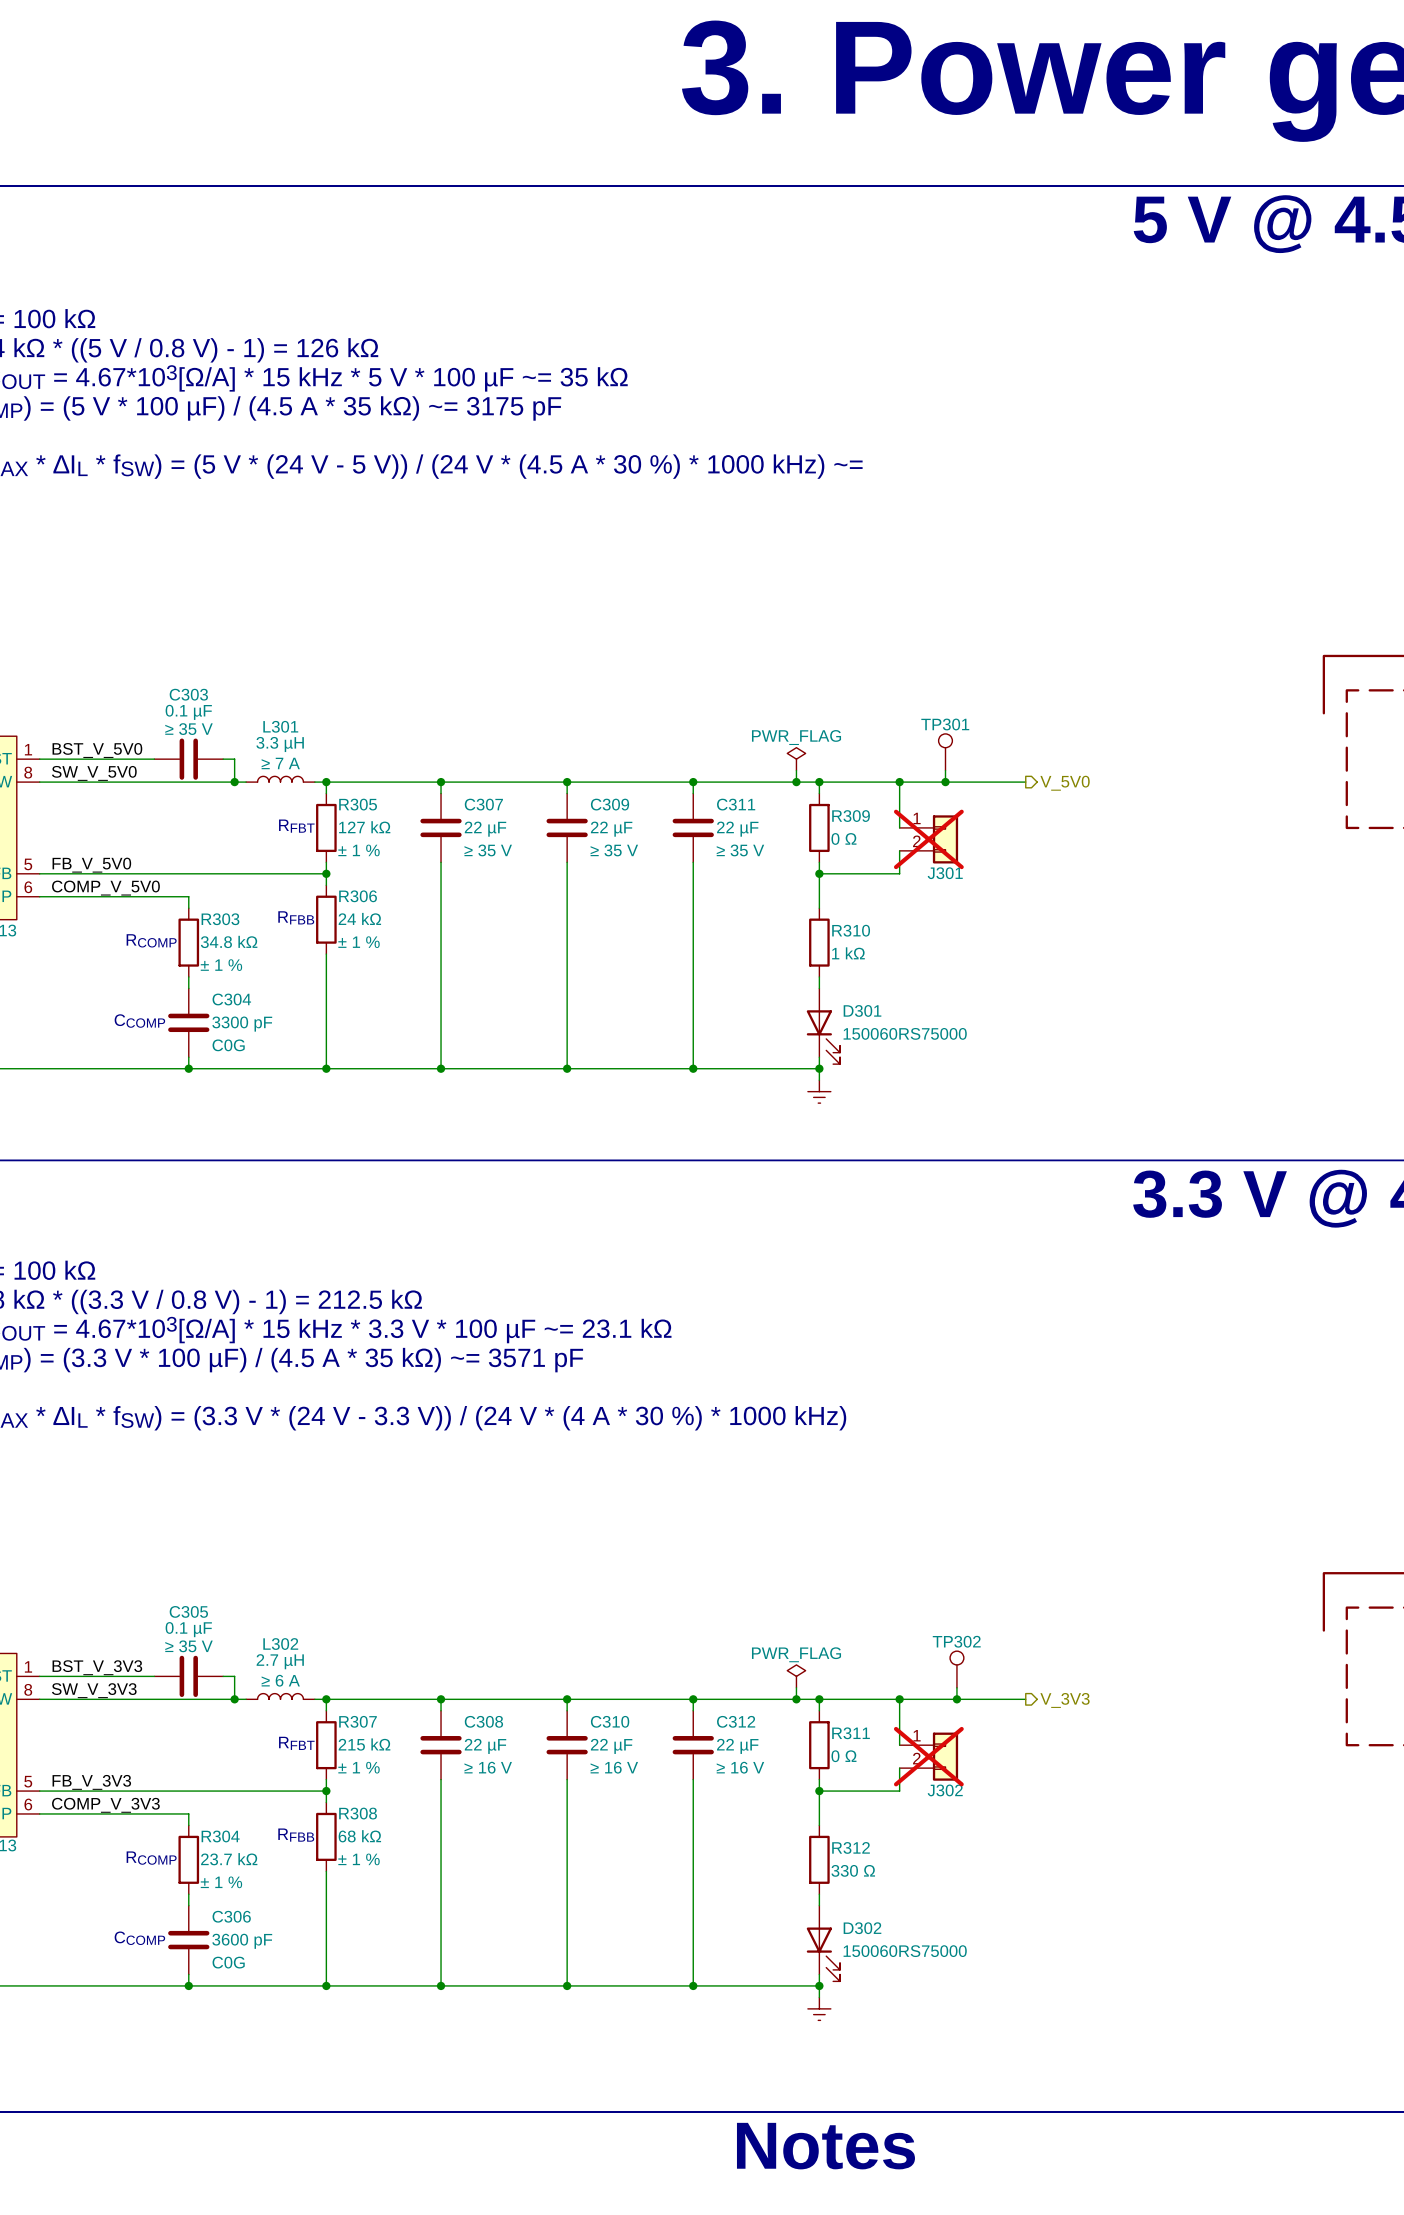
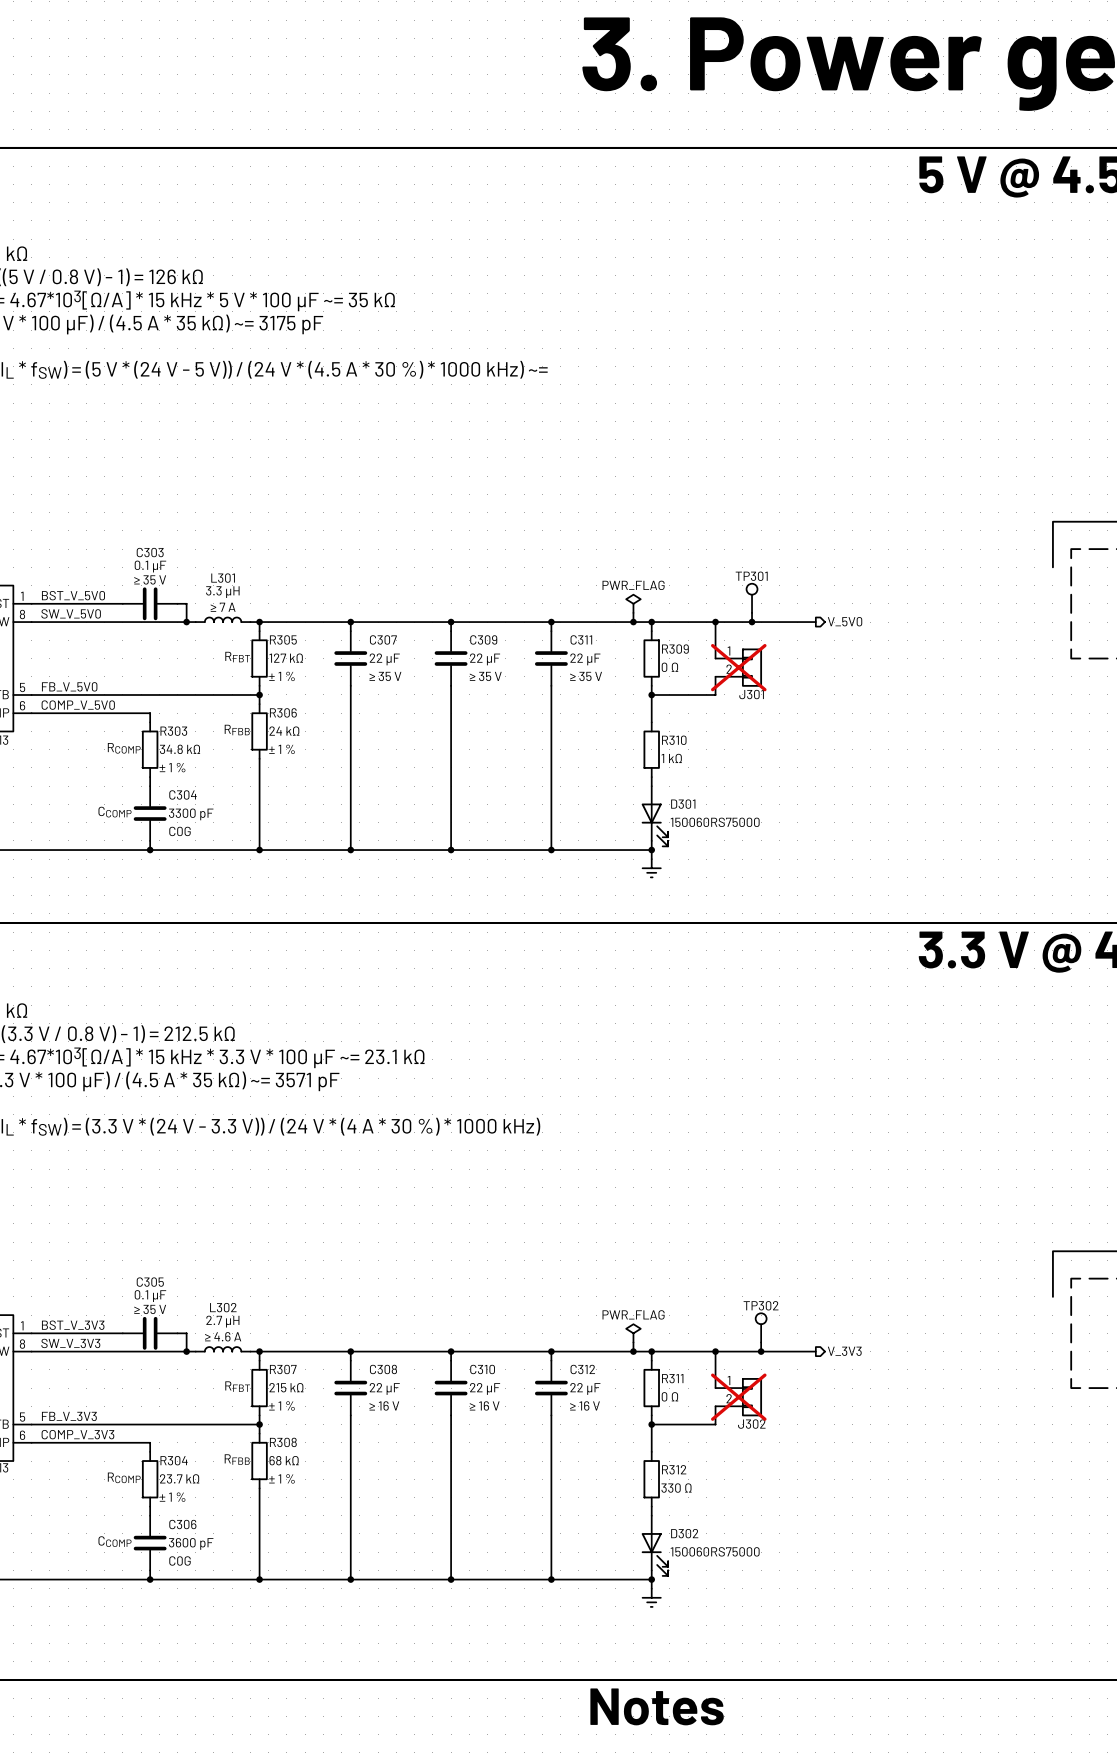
L302 text: ≥ 6 A (280, 1680) -> ≥ 4.6 A (223, 1336)

